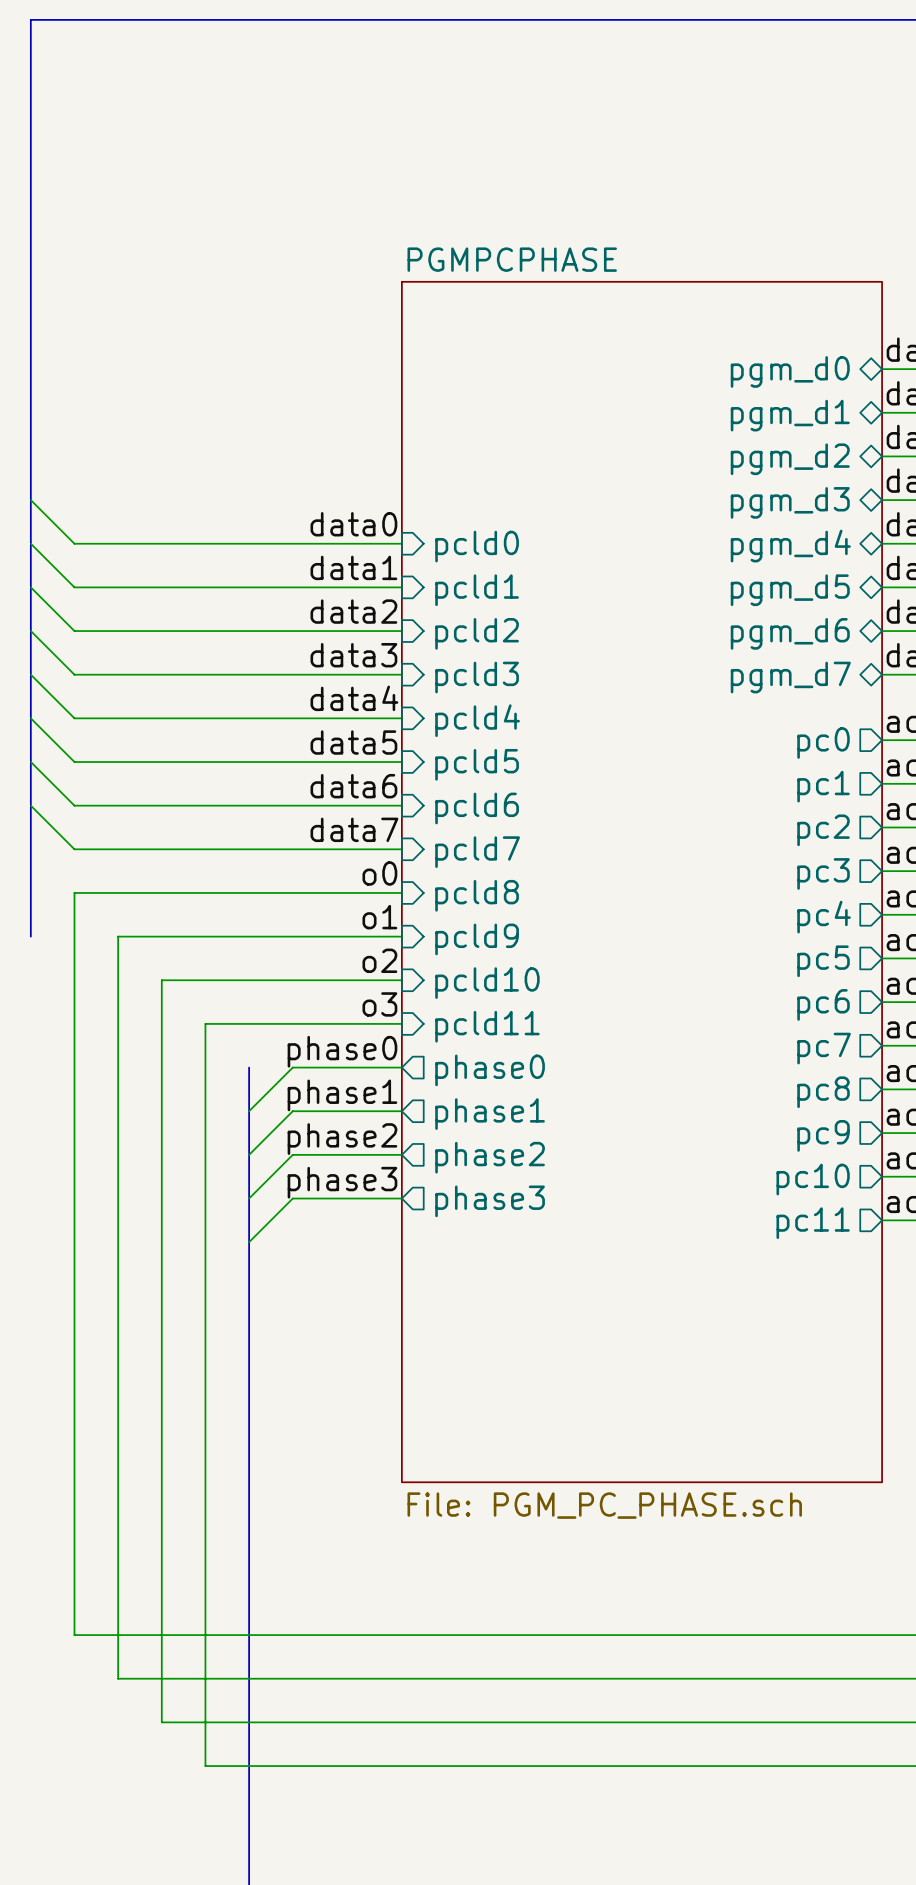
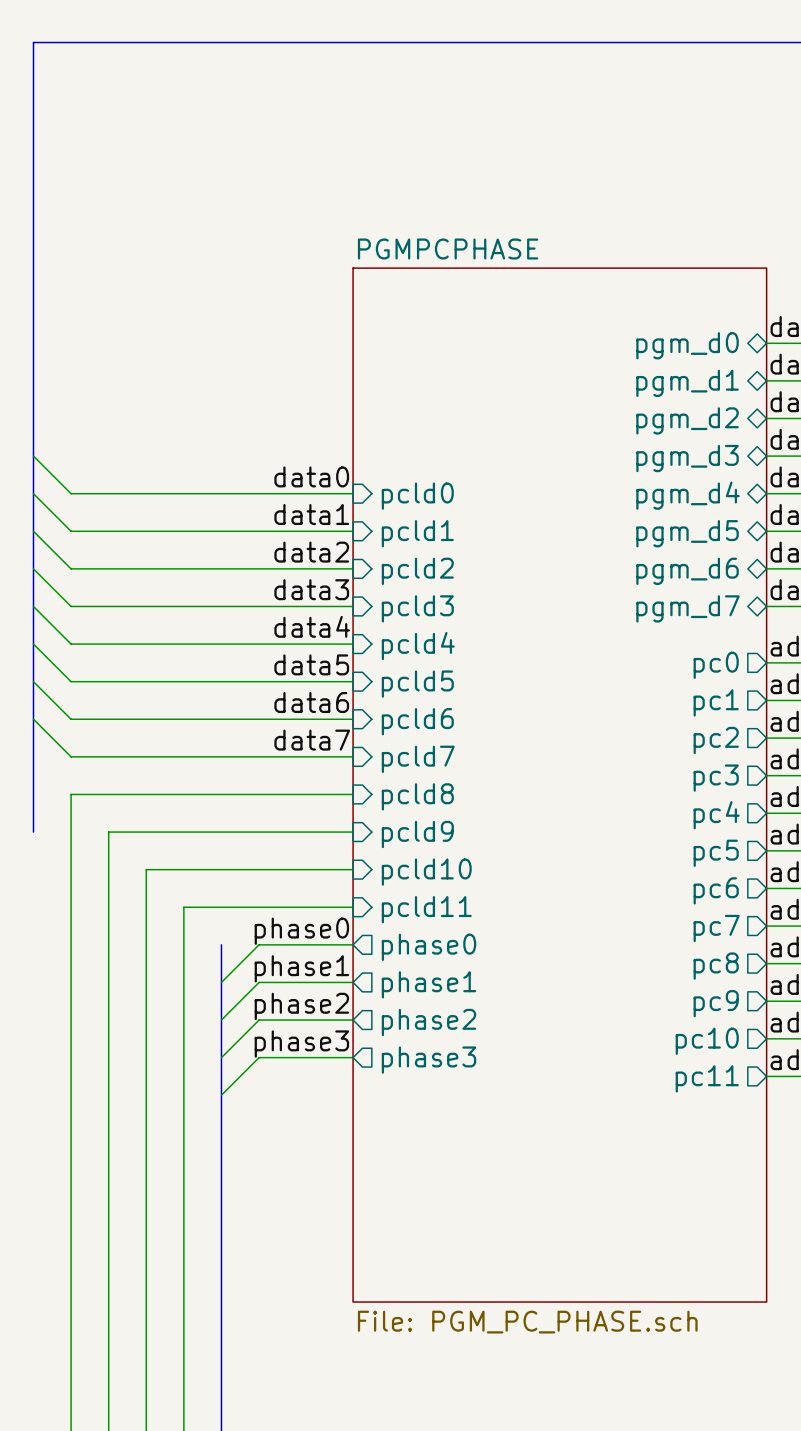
label: o0 (379, 873) -> none
label: o1 (379, 917) -> none
label: o2 (379, 960) -> none
label: o3 (379, 1004) -> none

